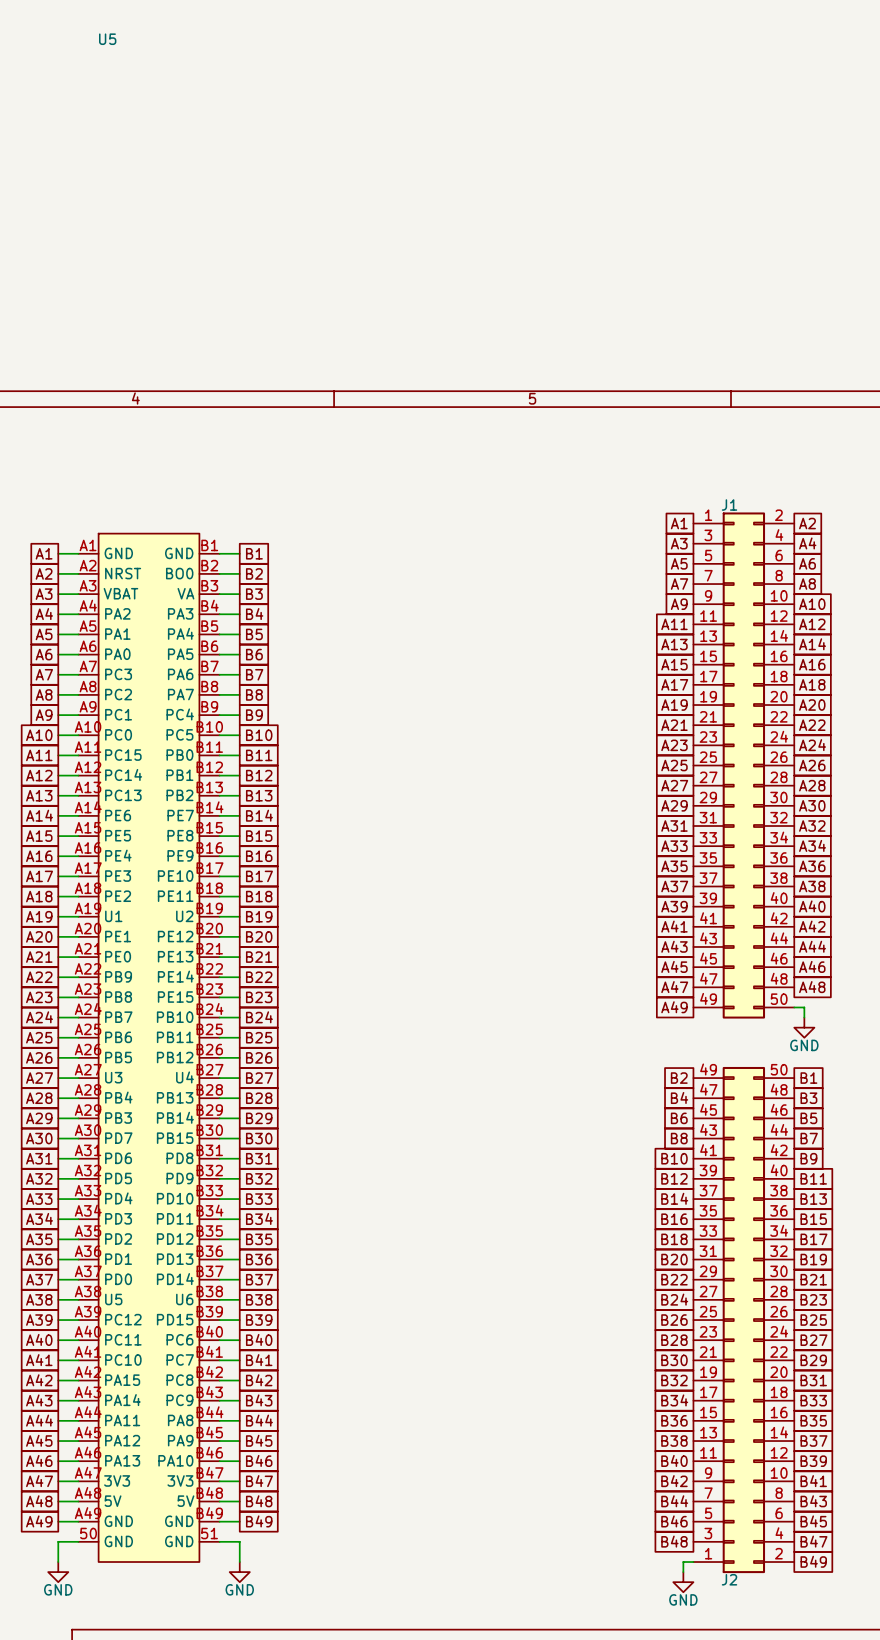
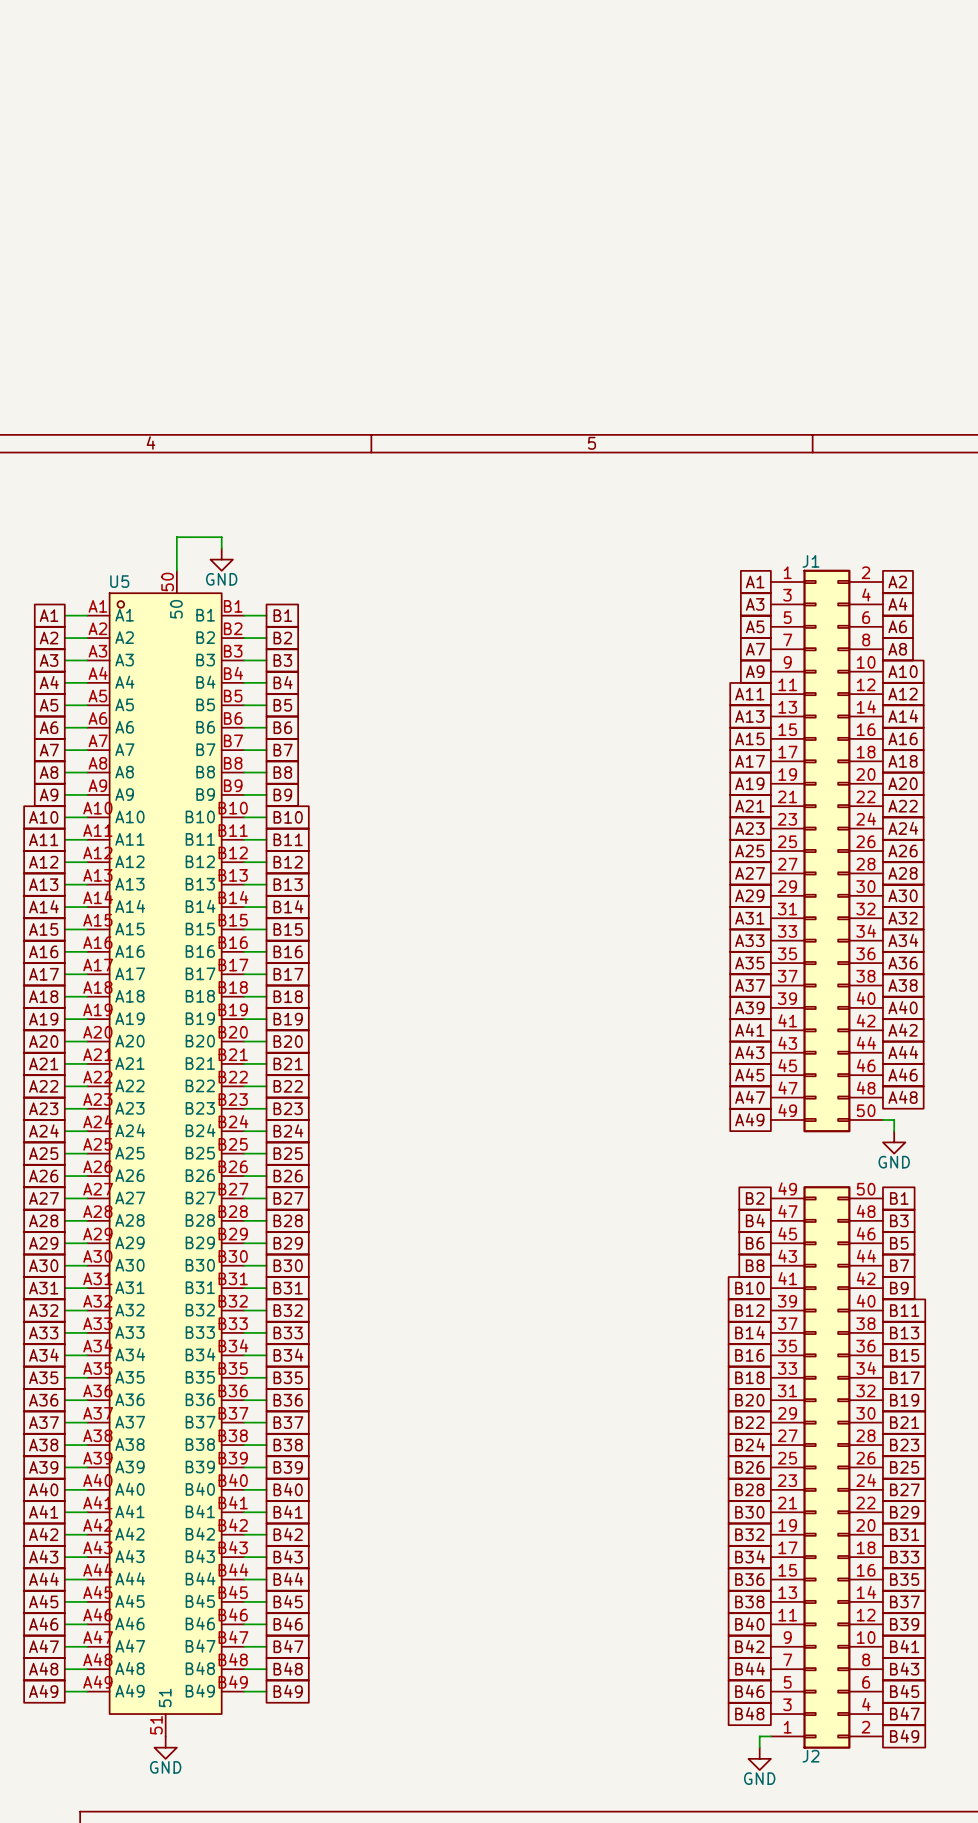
U5 name position: U5 (107, 39) -> U5 (119, 581)
wire: none -> (221, 548) (221, 537) (176, 537) (176, 570)
power symbol: none -> GND (221, 559)
U5 symbol: [78, 533, 220, 1563] -> [87, 570, 245, 1737]
wire: (78, 1541) (58, 1541) (58, 1562) -> none
wire: (219, 1541) (239, 1541) (239, 1562) -> none
power symbol: GND (58, 1572) -> none
power symbol: none -> GND (165, 1747)
power symbol: GND (239, 1572) -> none

